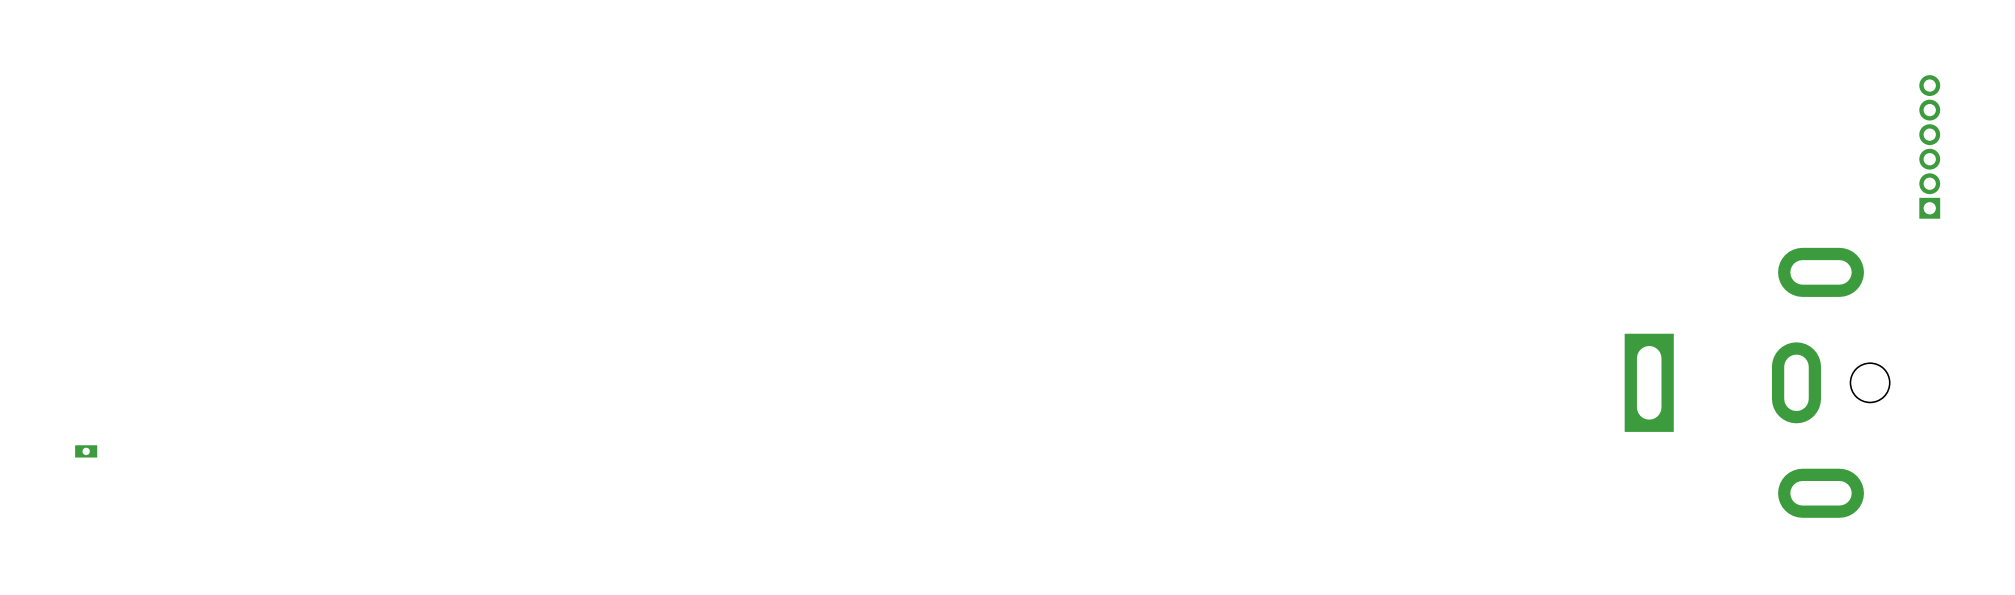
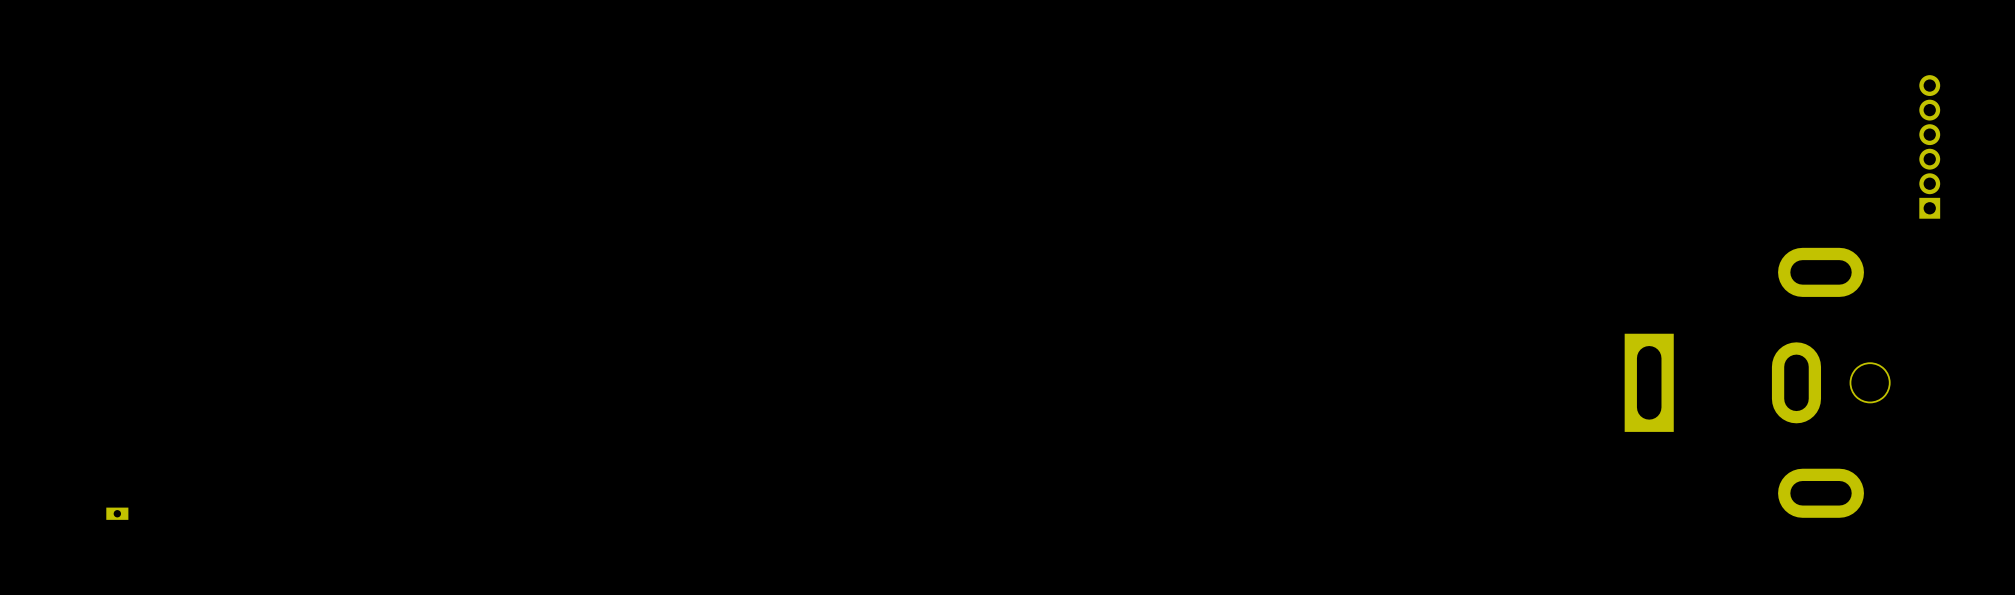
part position: (86, 451) -> (117, 513)

